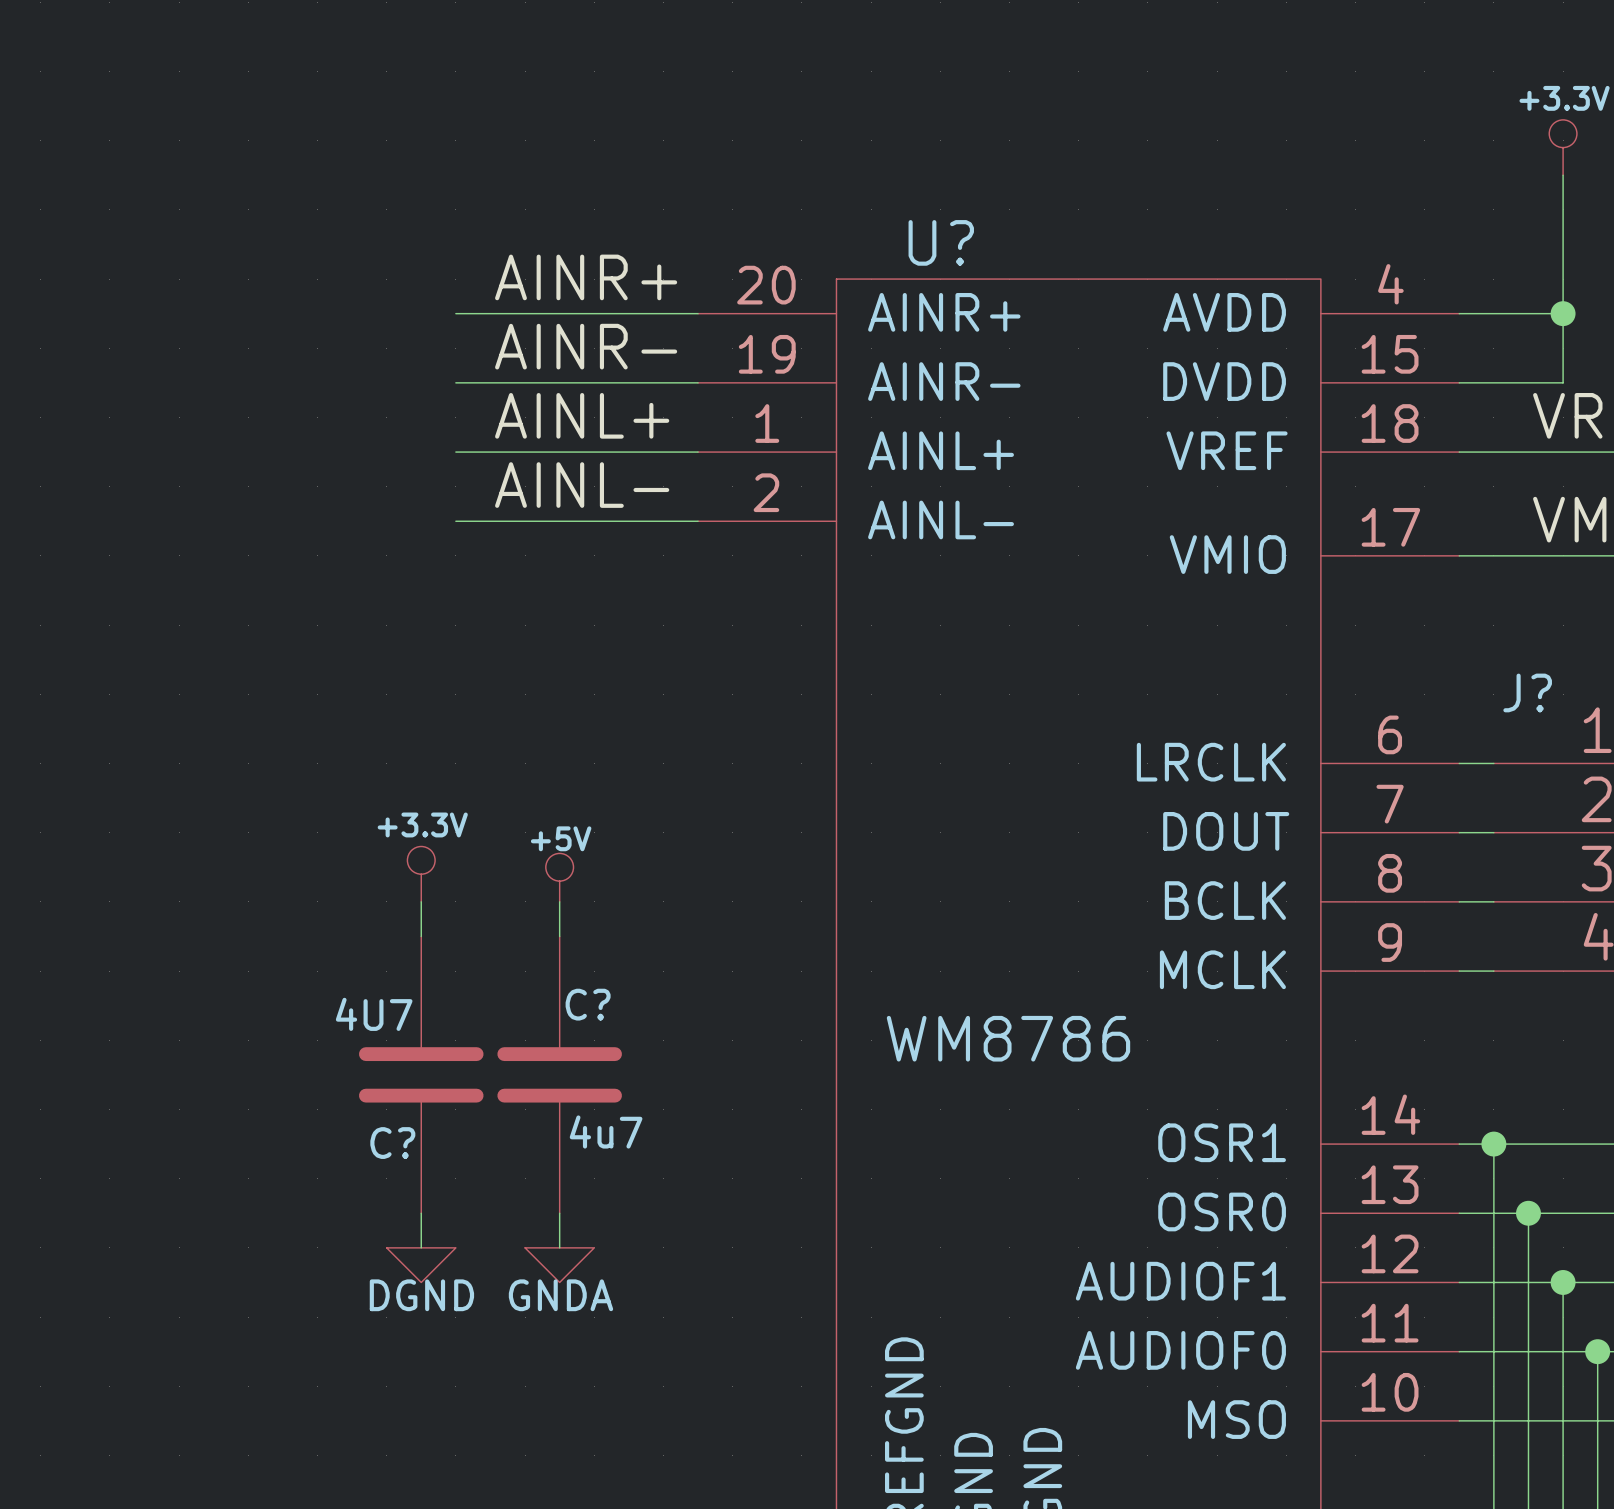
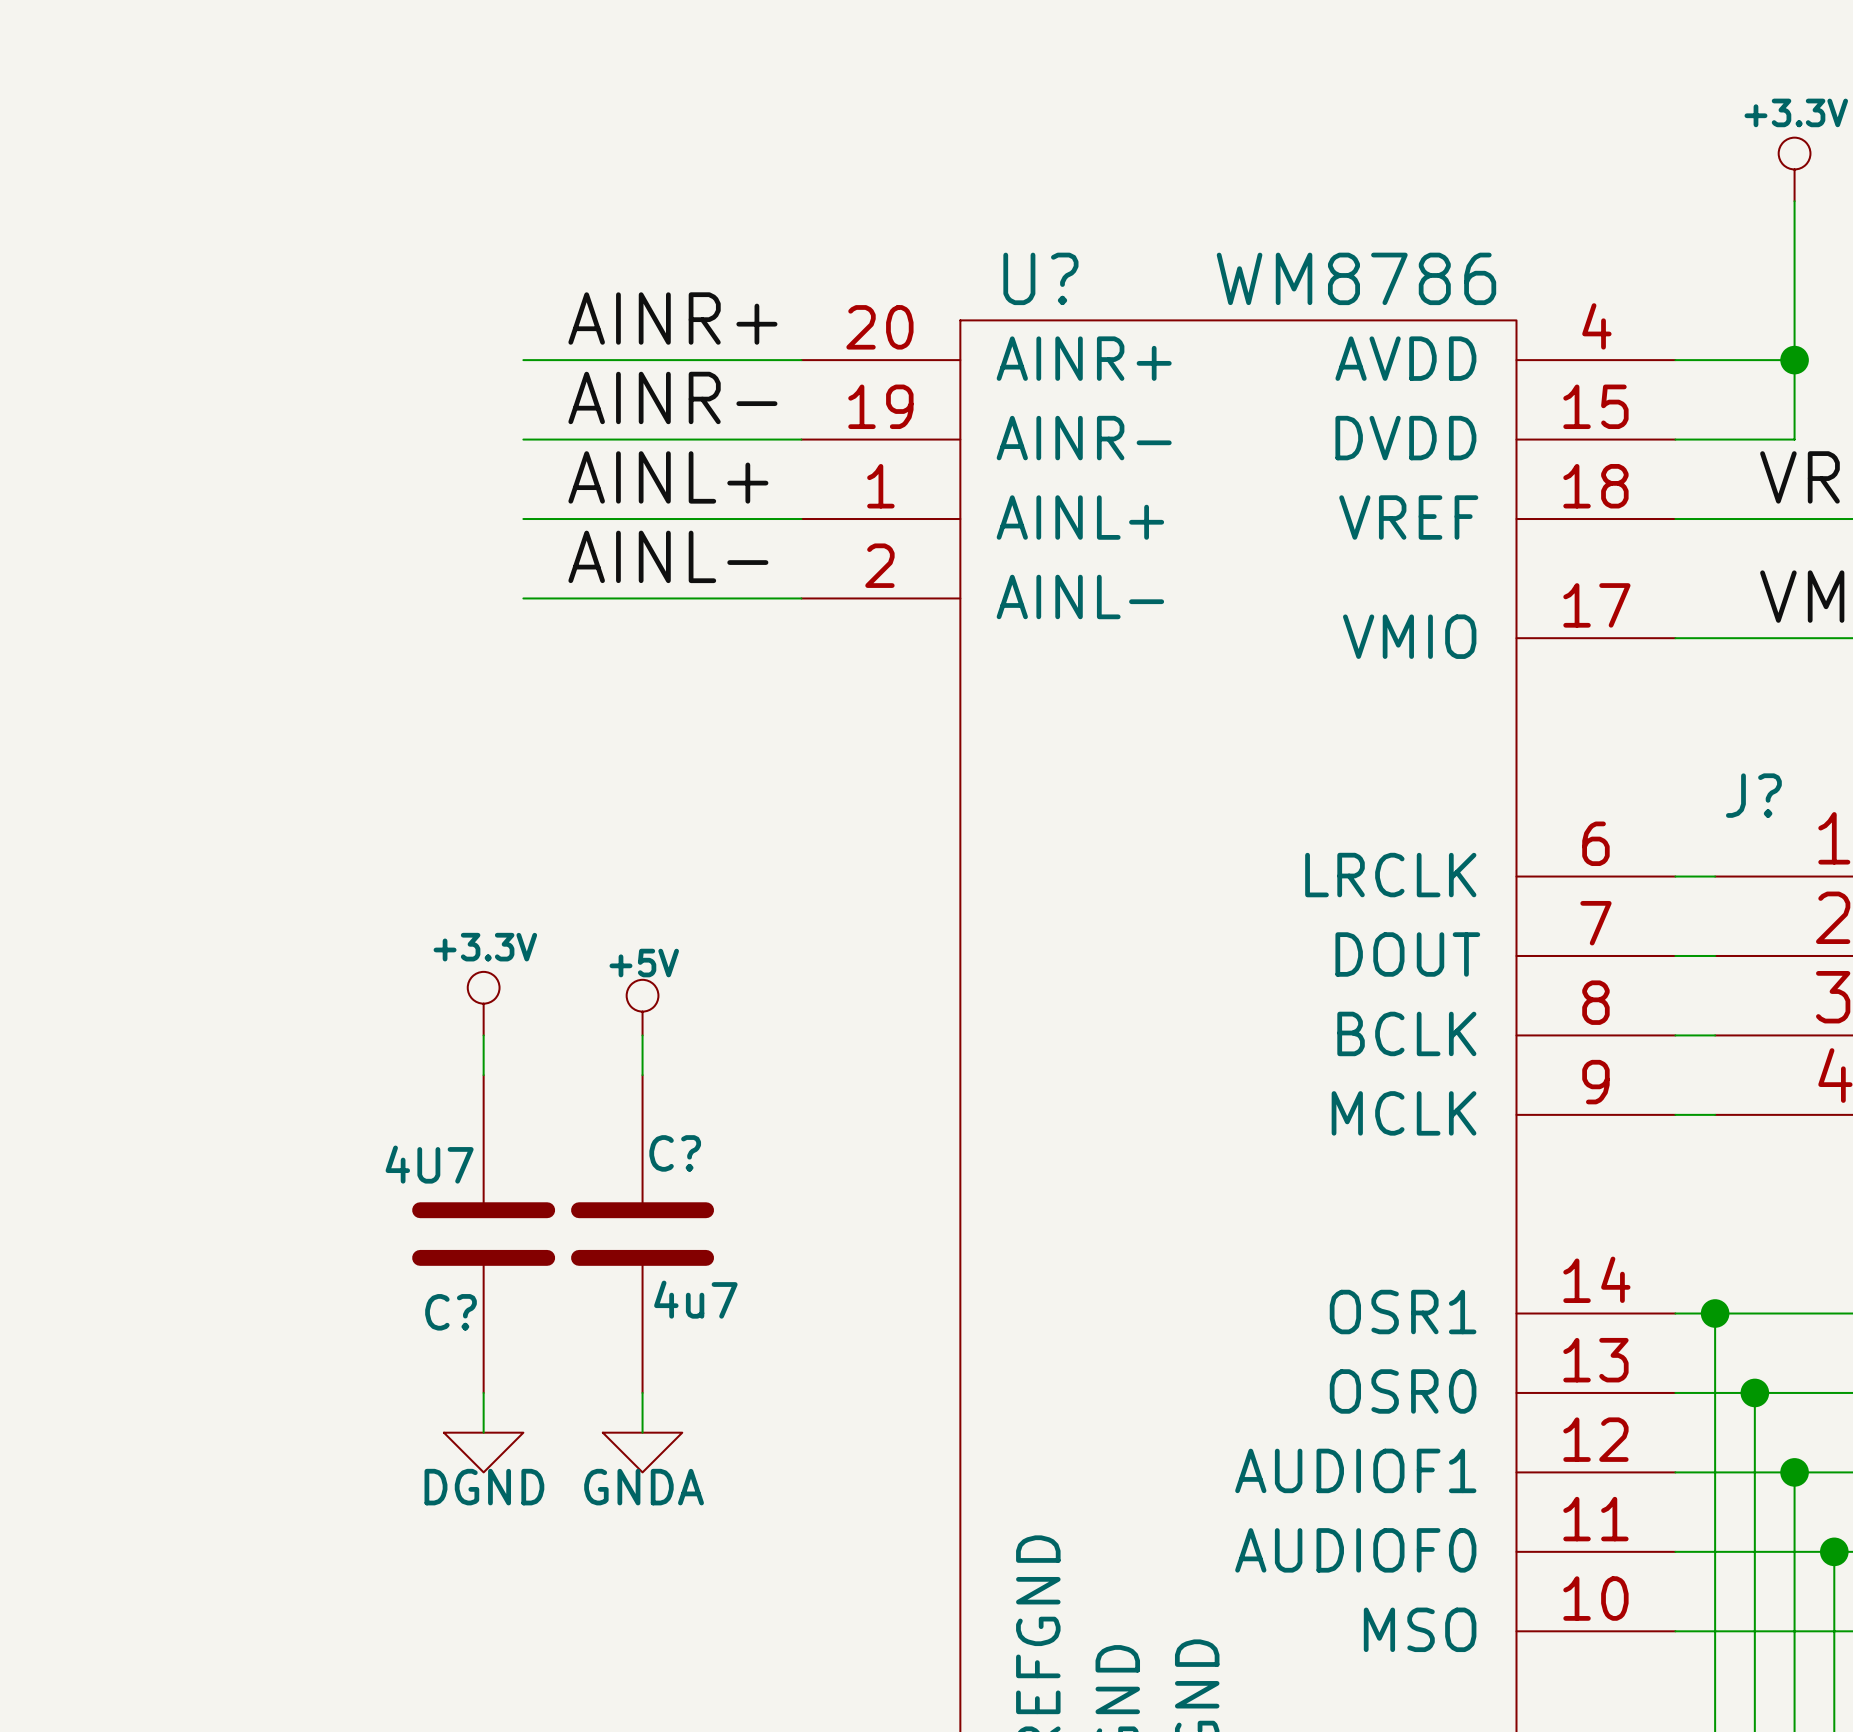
U? name position: U? (941, 242) -> U? (1040, 278)
U? value position: WM8786 (1008, 1038) -> WM8786 (1356, 278)

